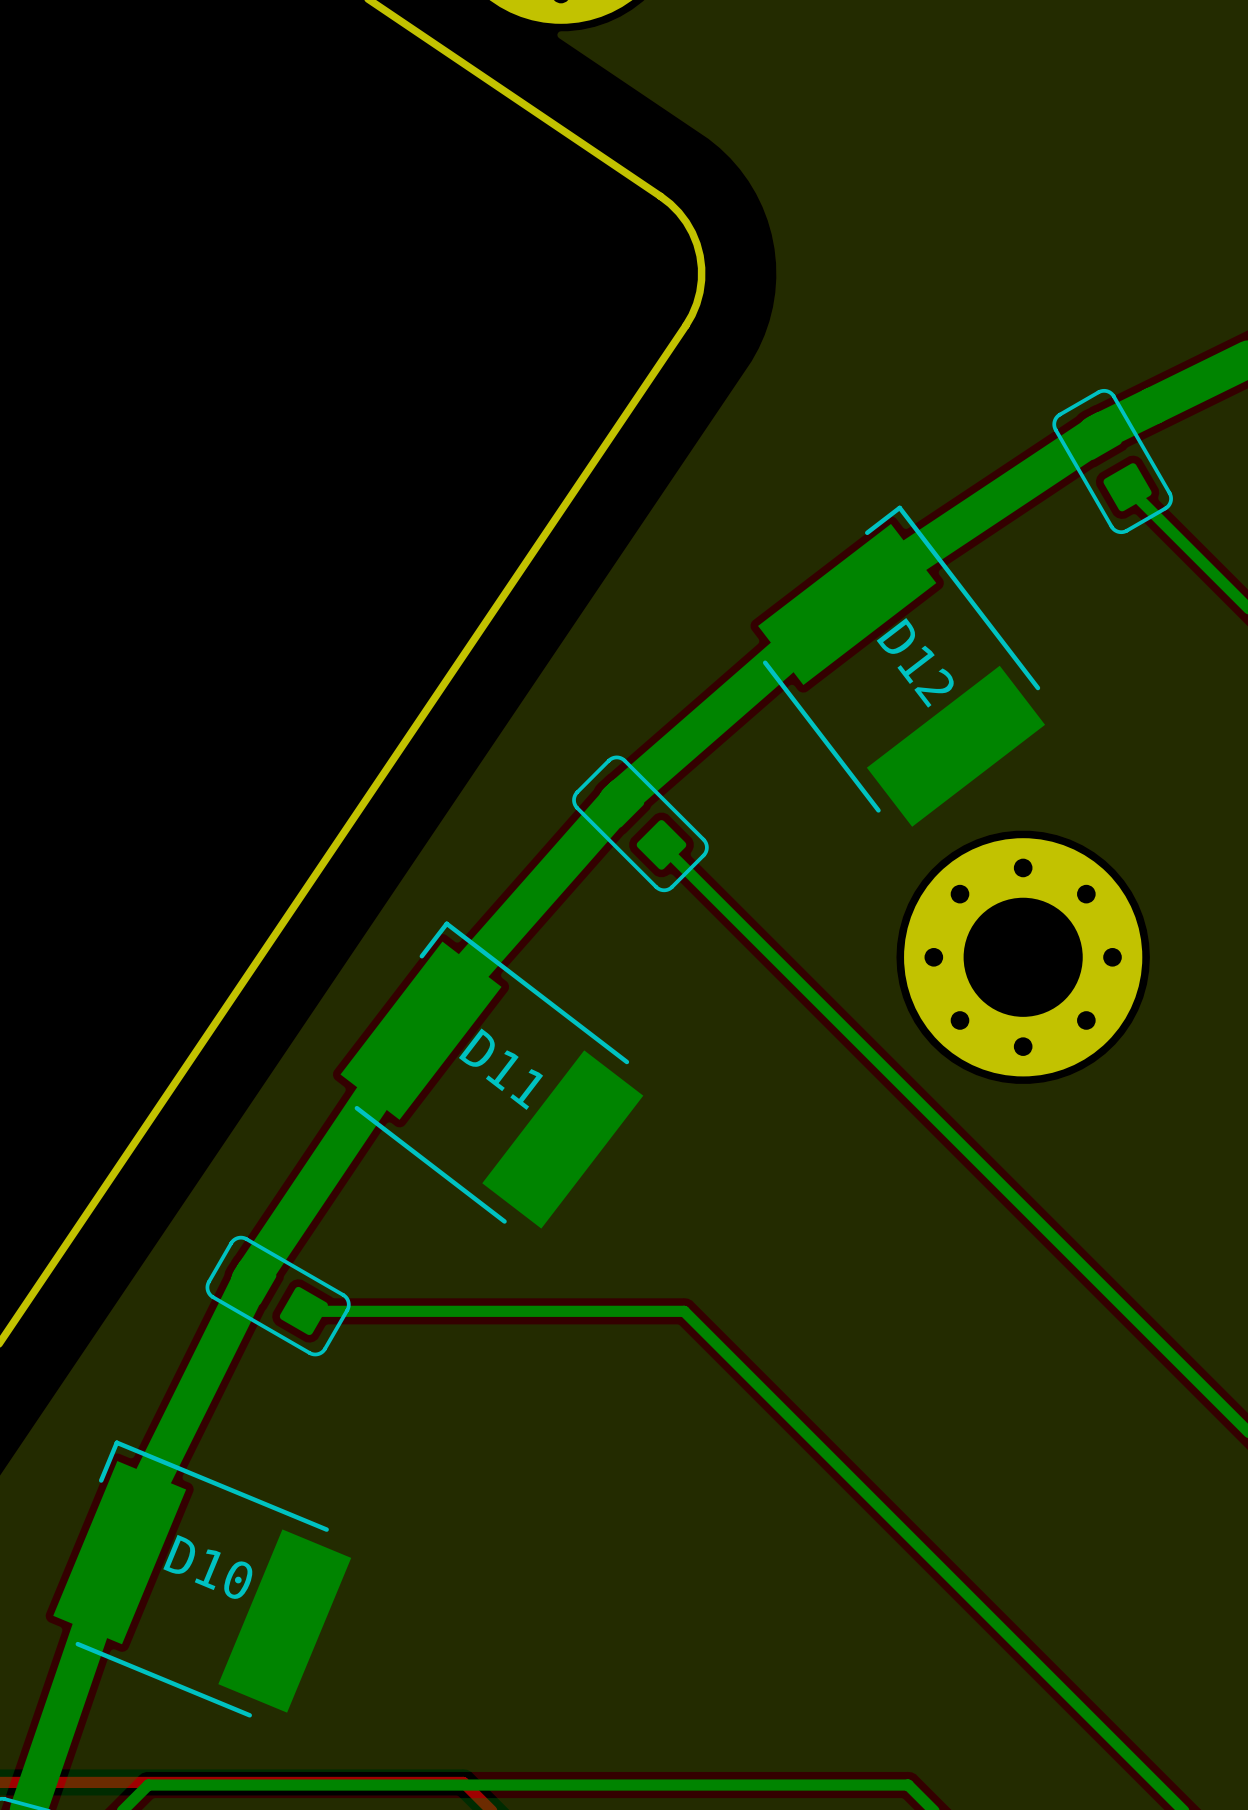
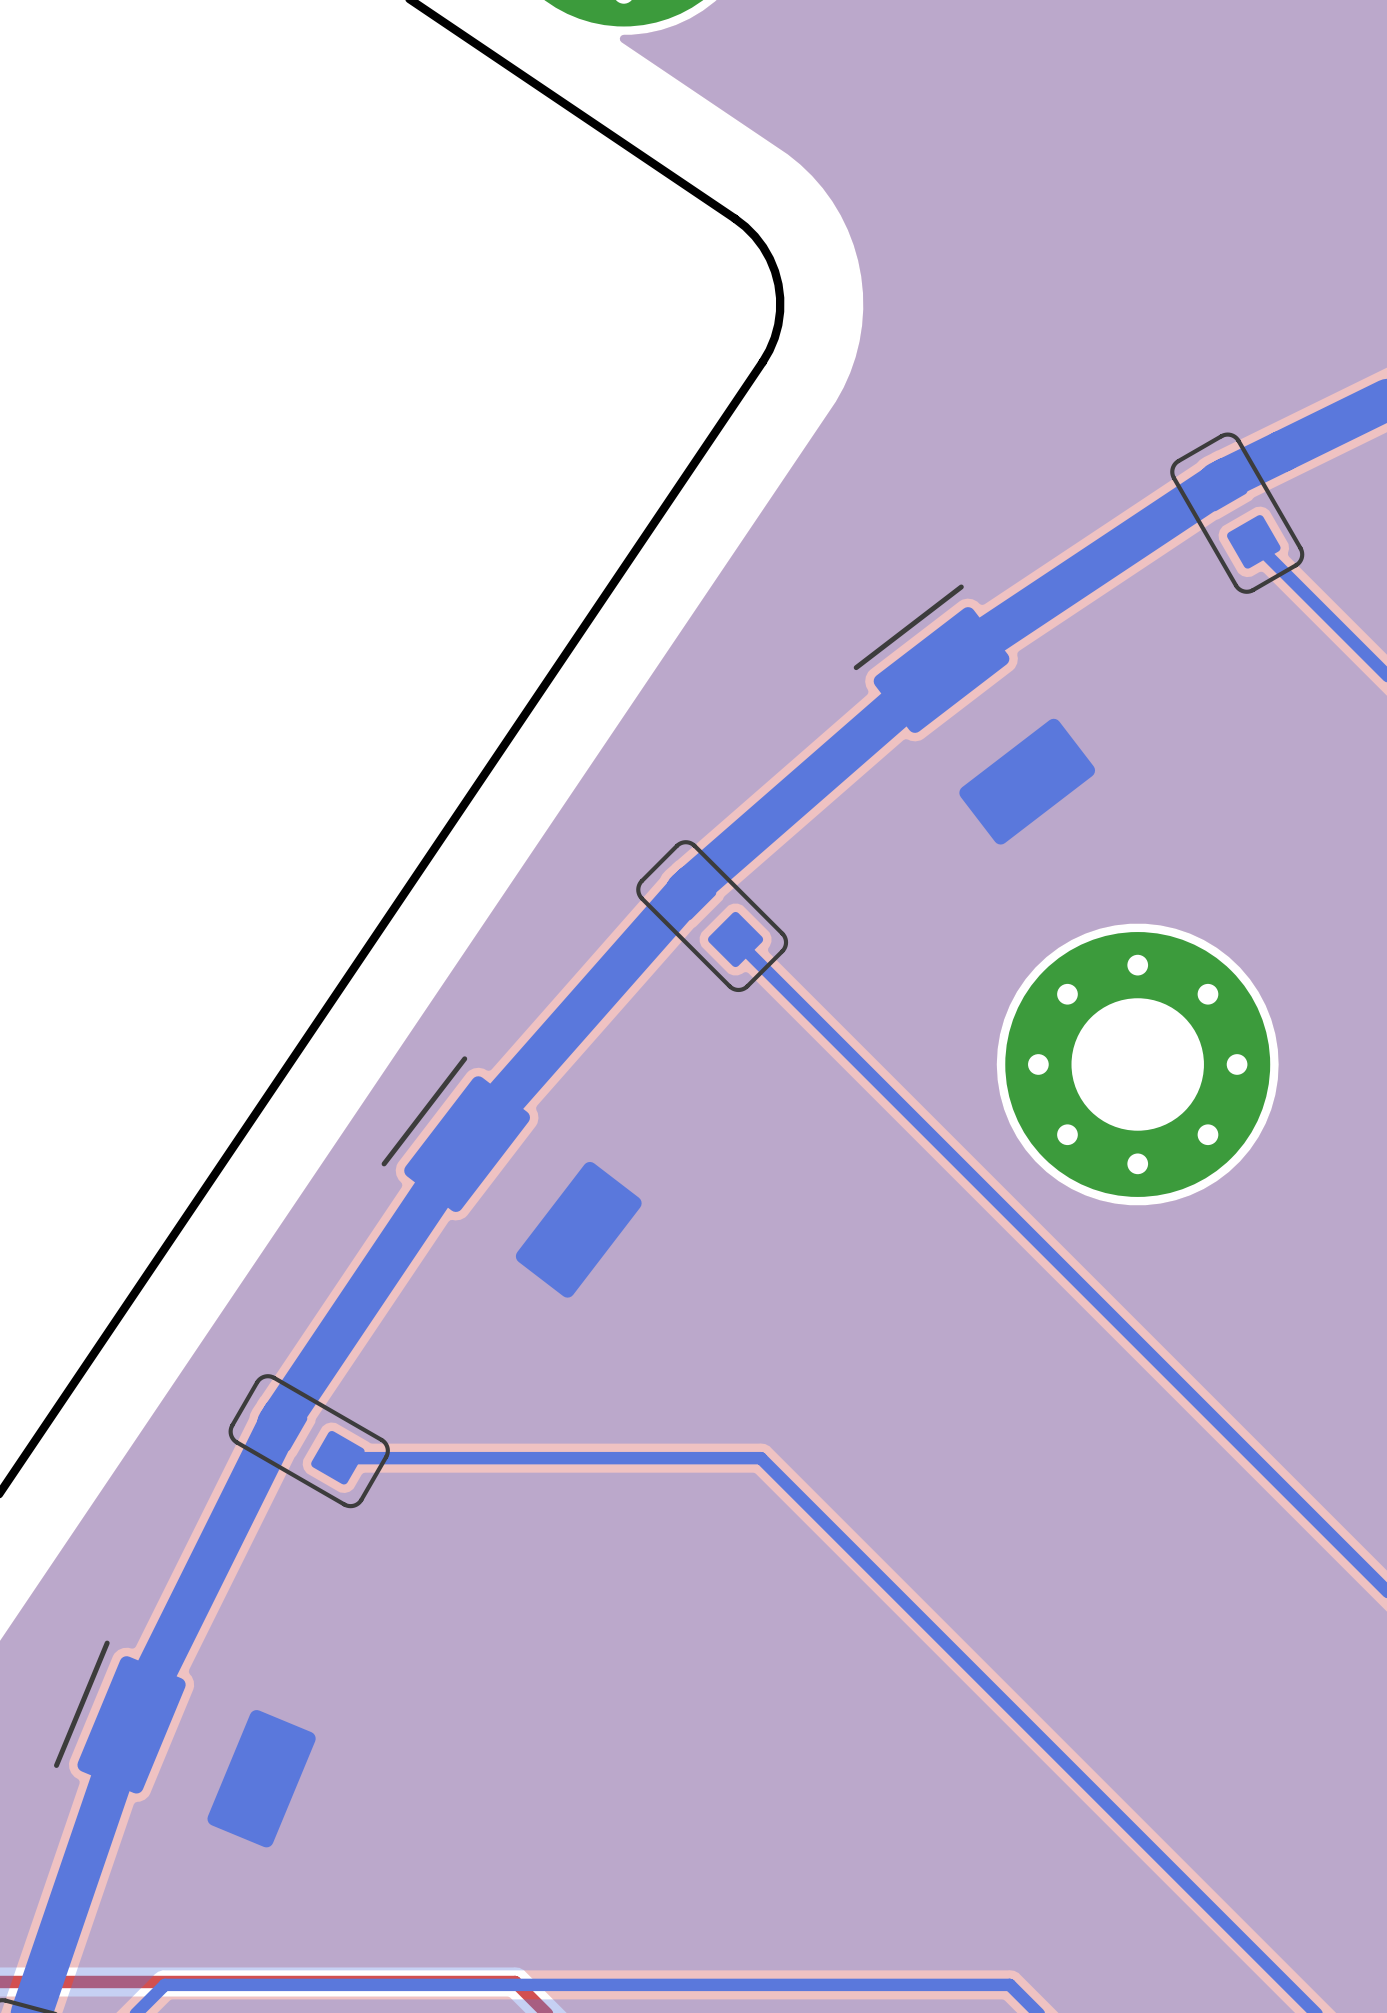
part: none -> (974, 714)
D12: (901, 666) -> none
part: none -> (511, 1176)
D11: (491, 1075) -> none
part: none -> (184, 1743)
D10: (202, 1579) -> none

